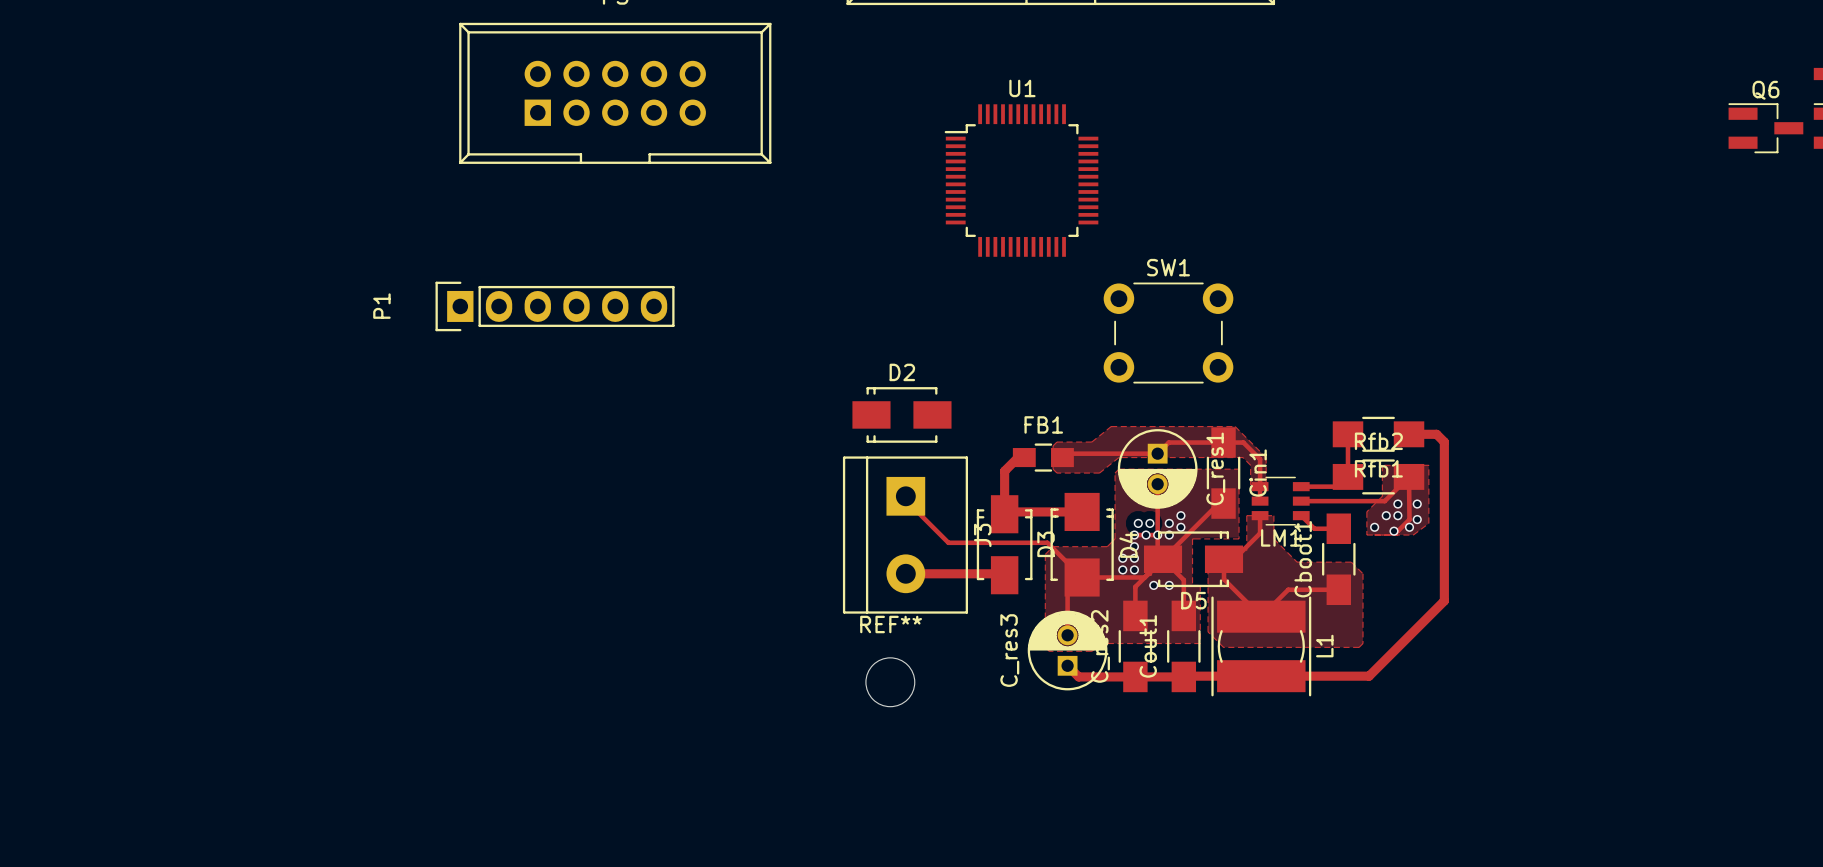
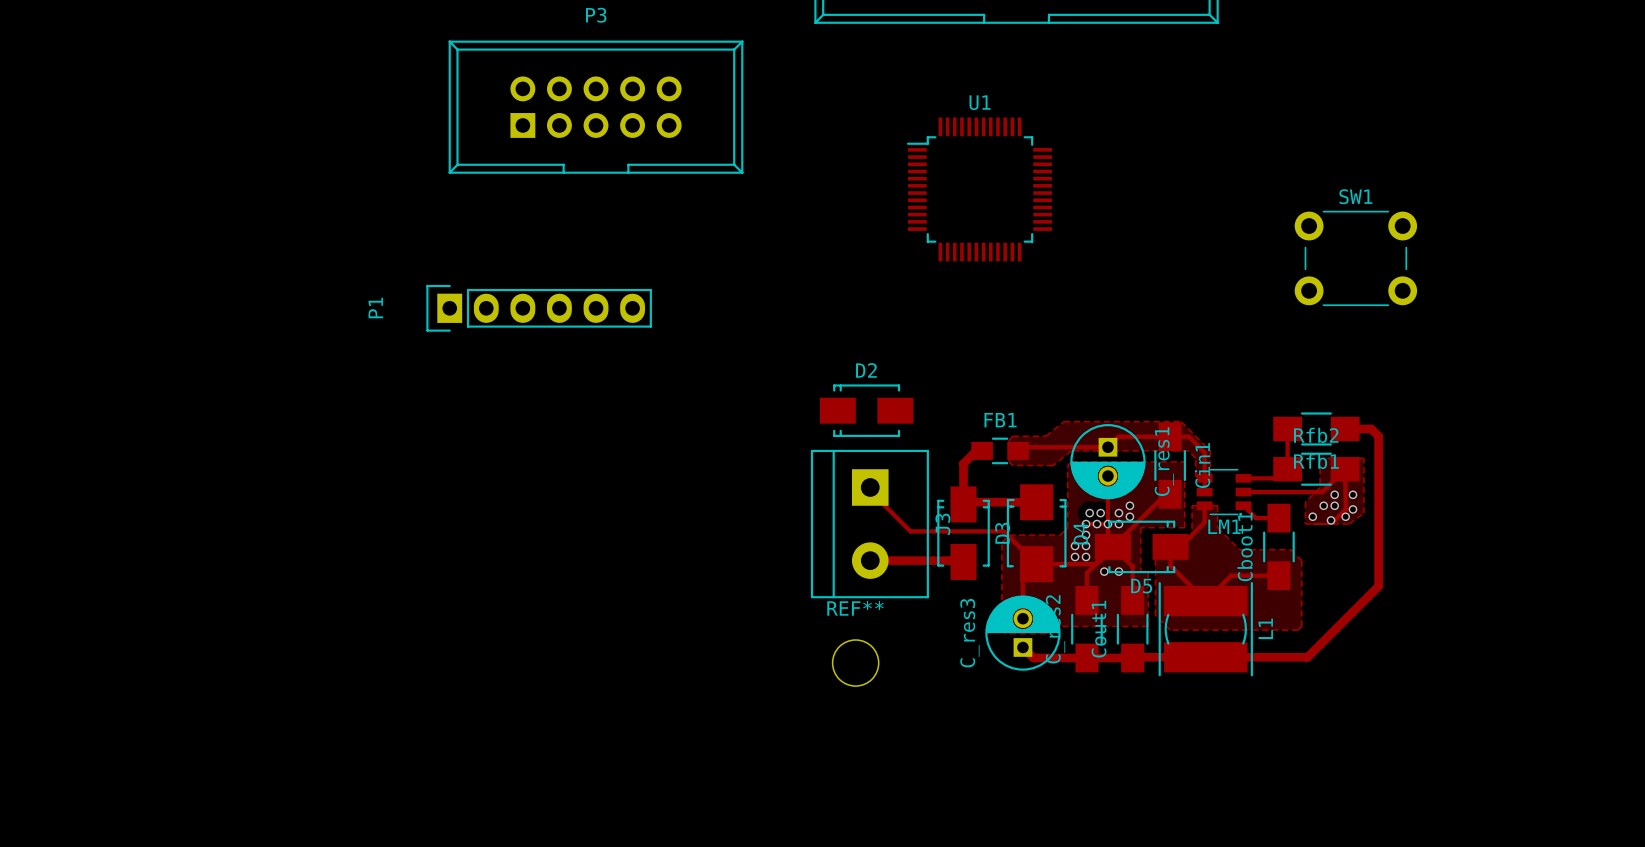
SW1 position: (1168, 333) -> (1355, 258)

